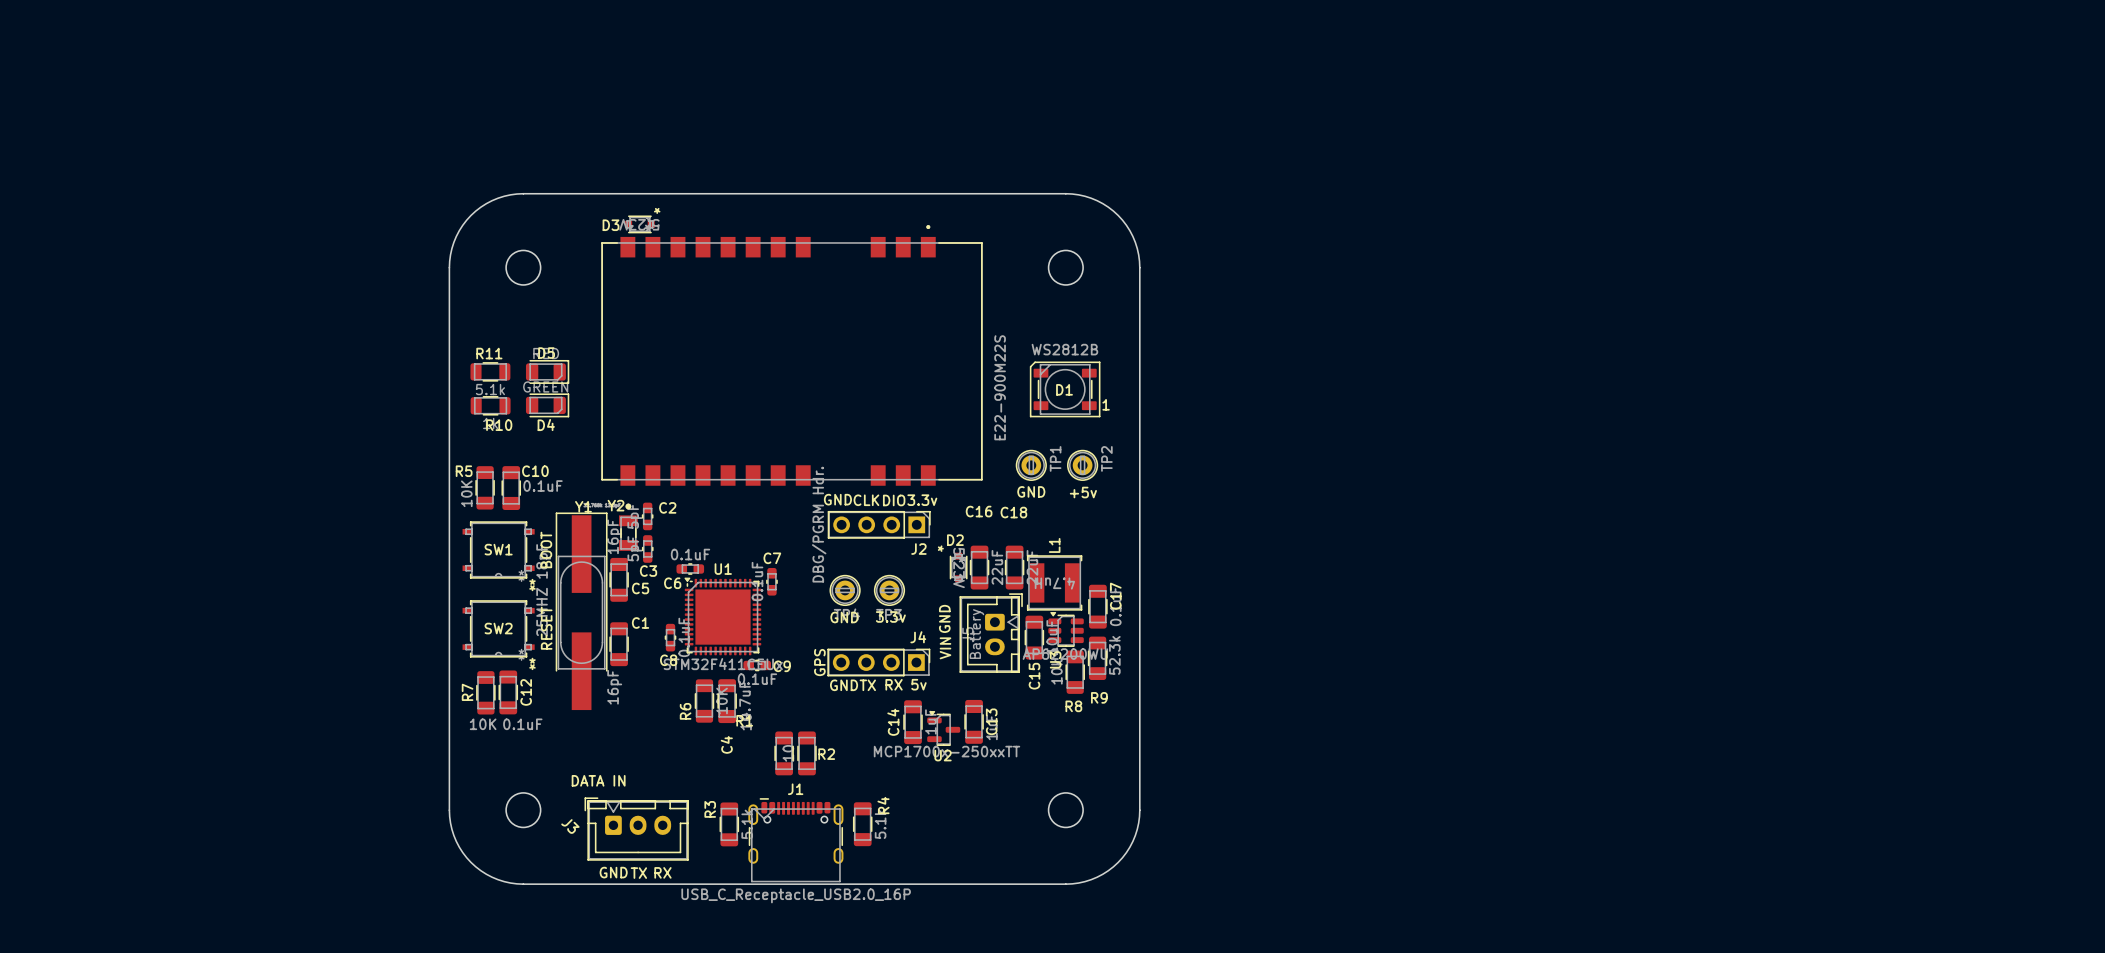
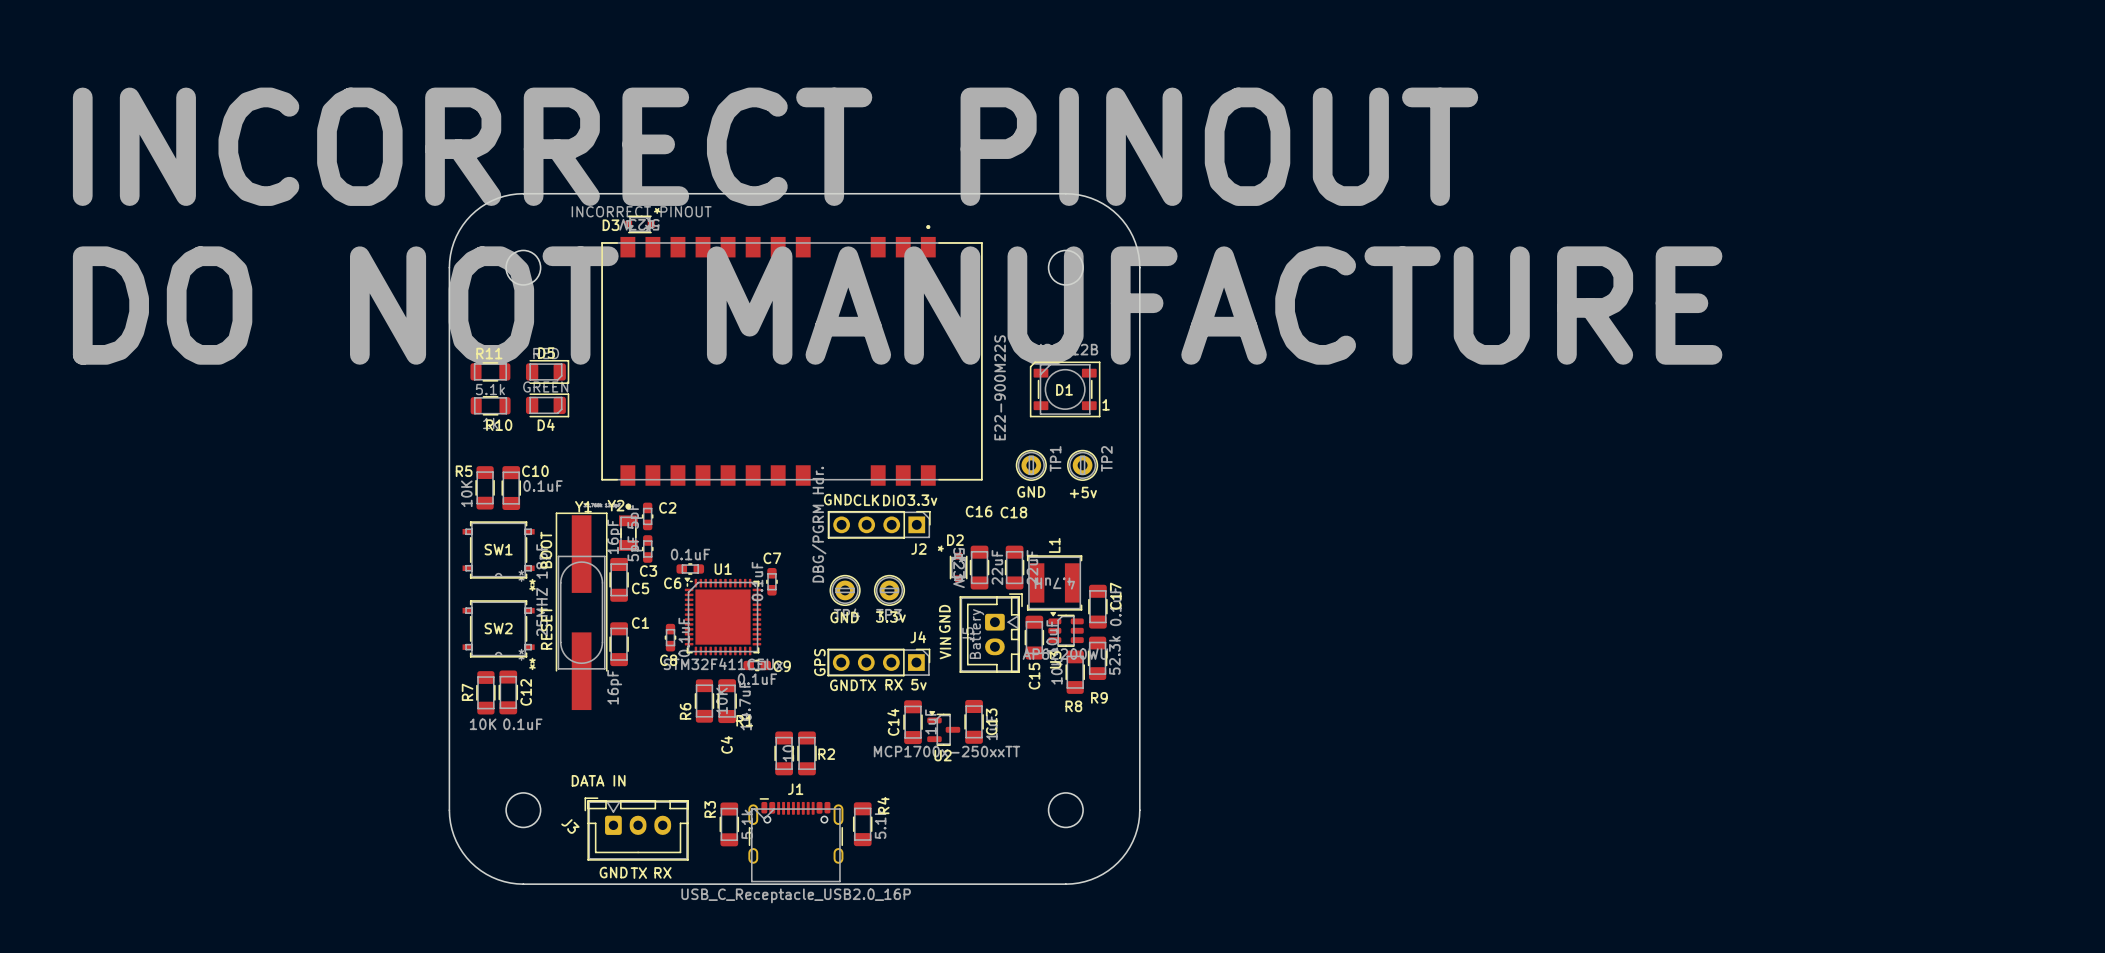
text: none -> INCORRECT PINOUT (775, 146)
text: none -> INCORRECT PINOUT (641, 211)
text: none -> DO NOT MANUFACTURE (897, 305)

